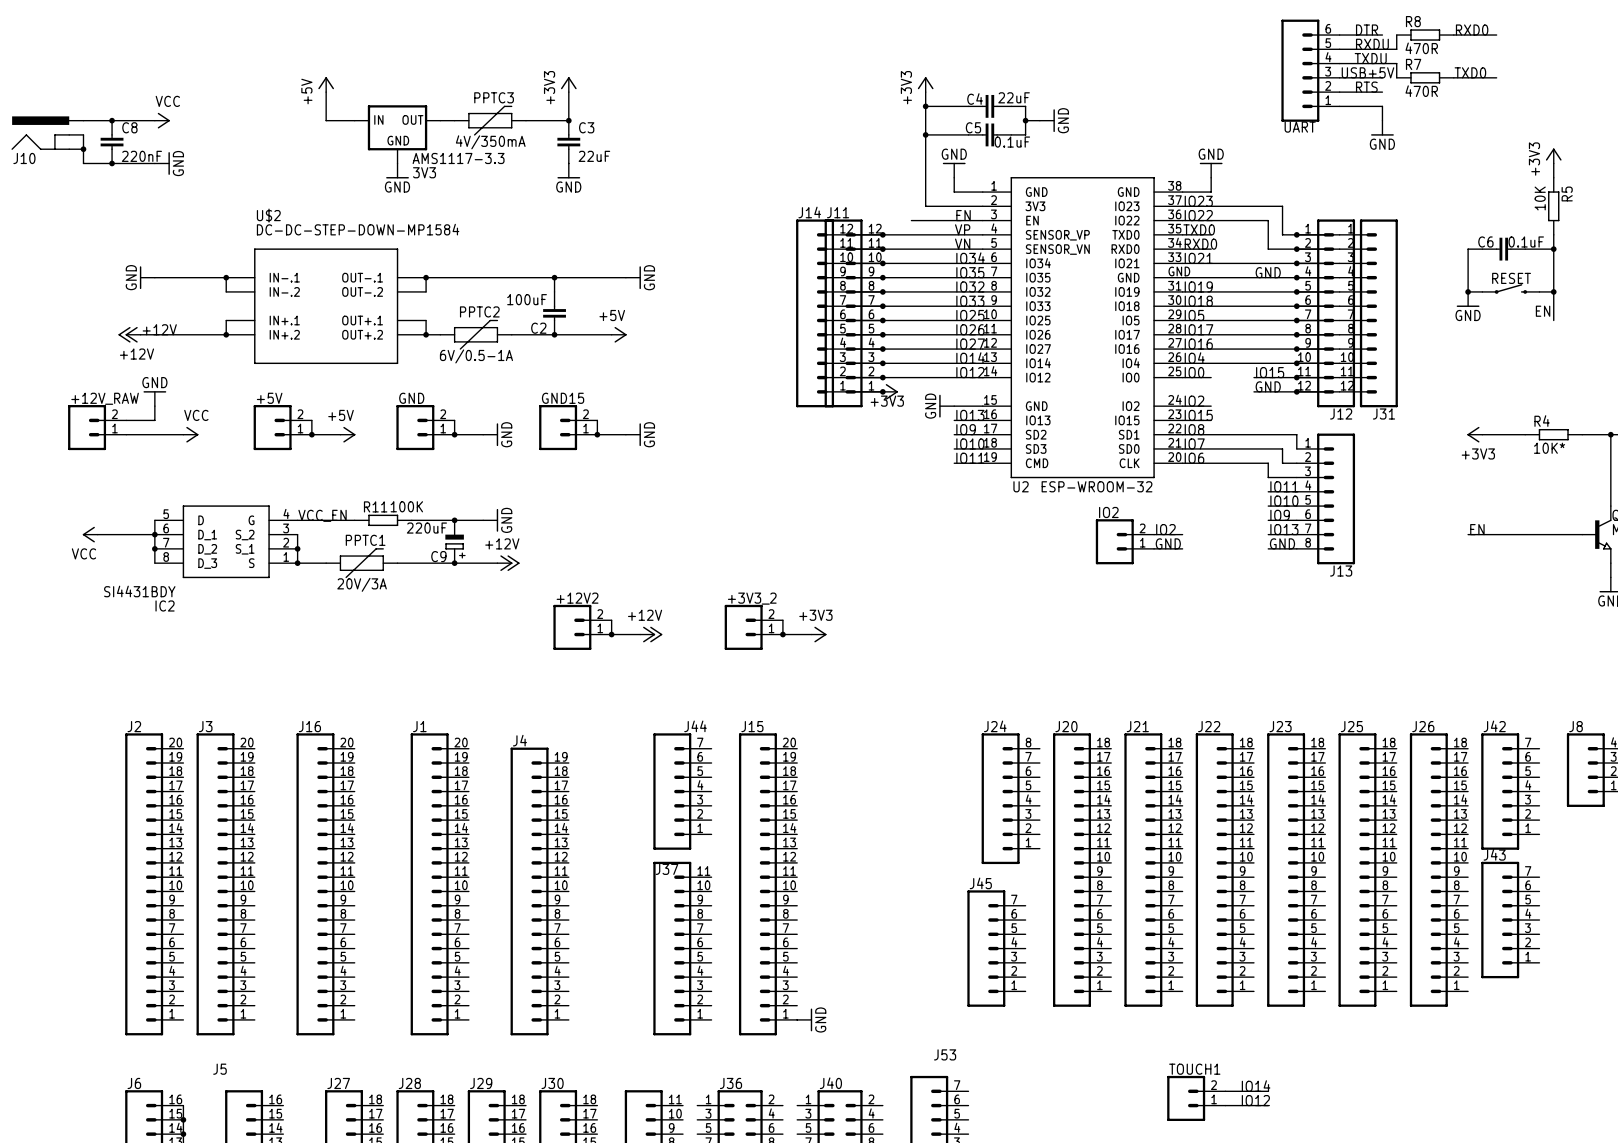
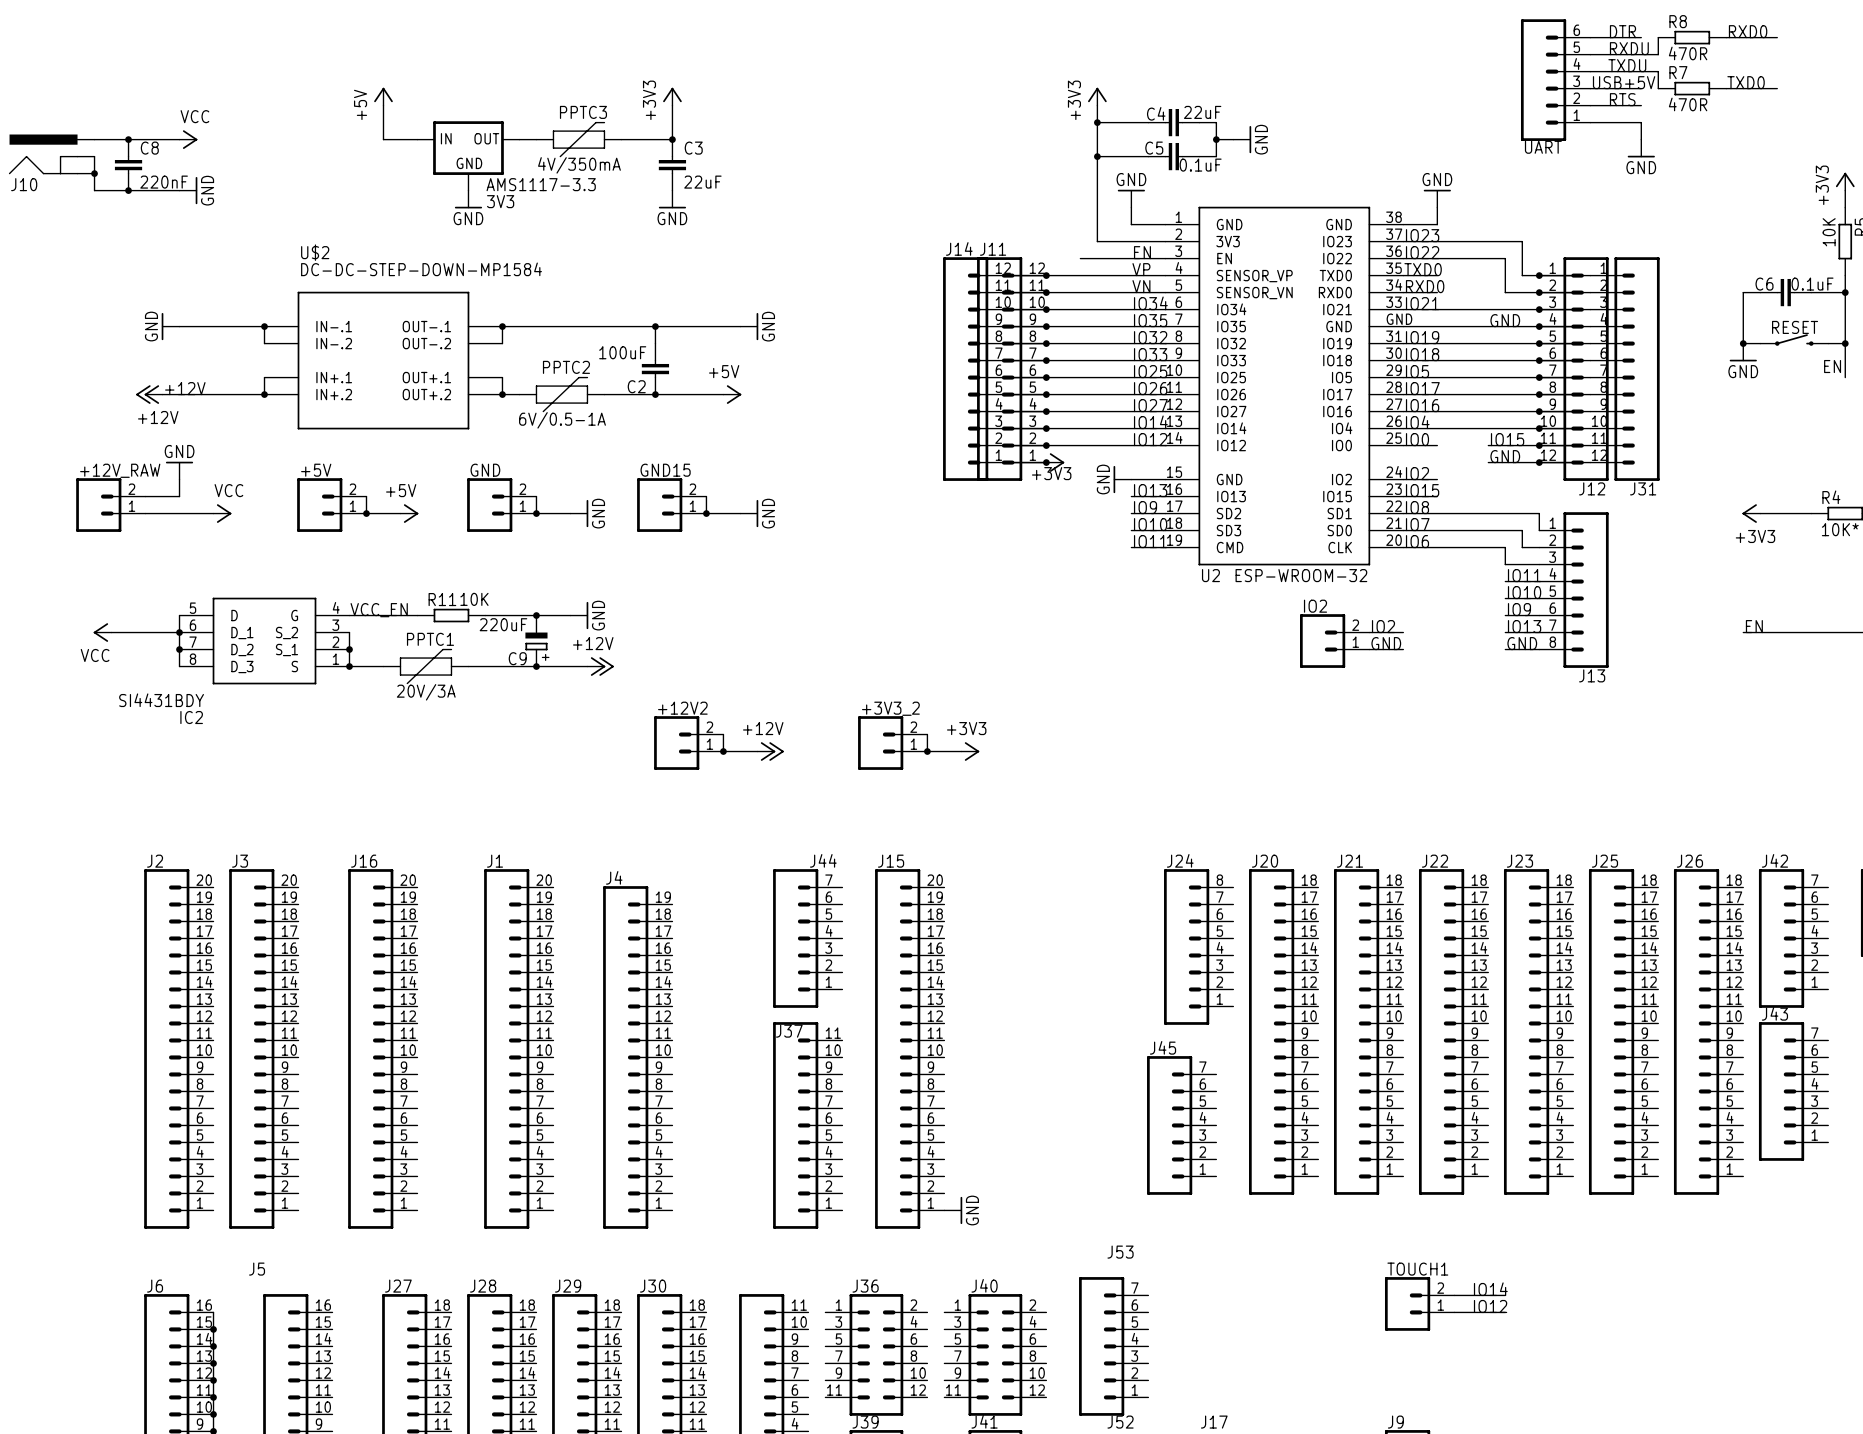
R11 value: 100K (406, 506) -> 10K (474, 599)

